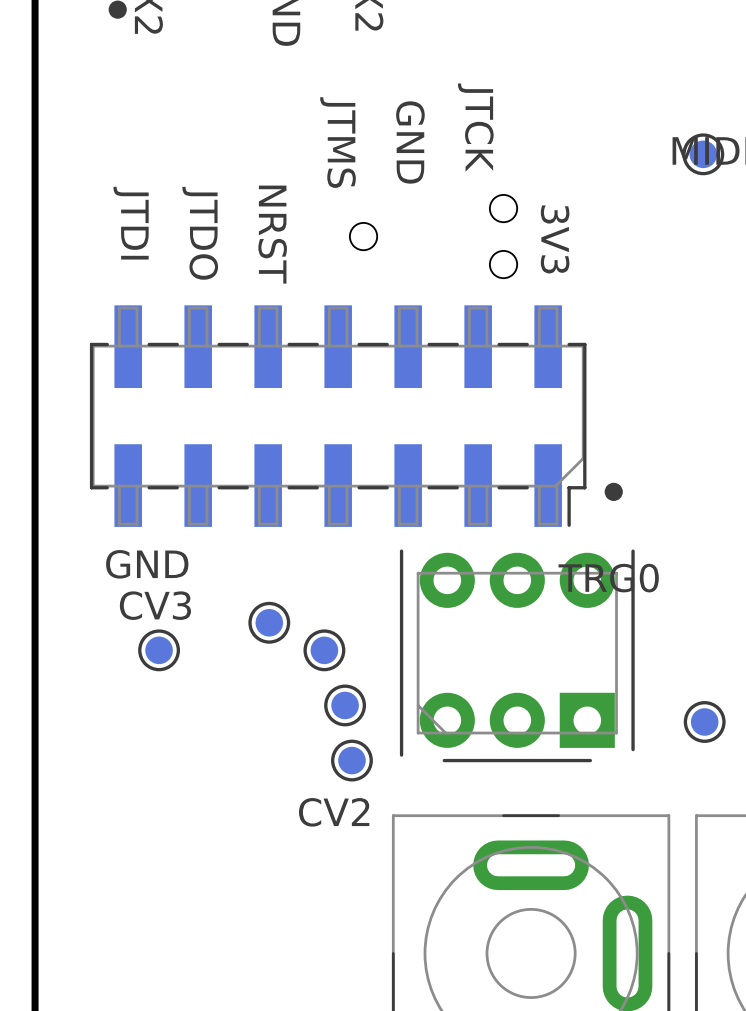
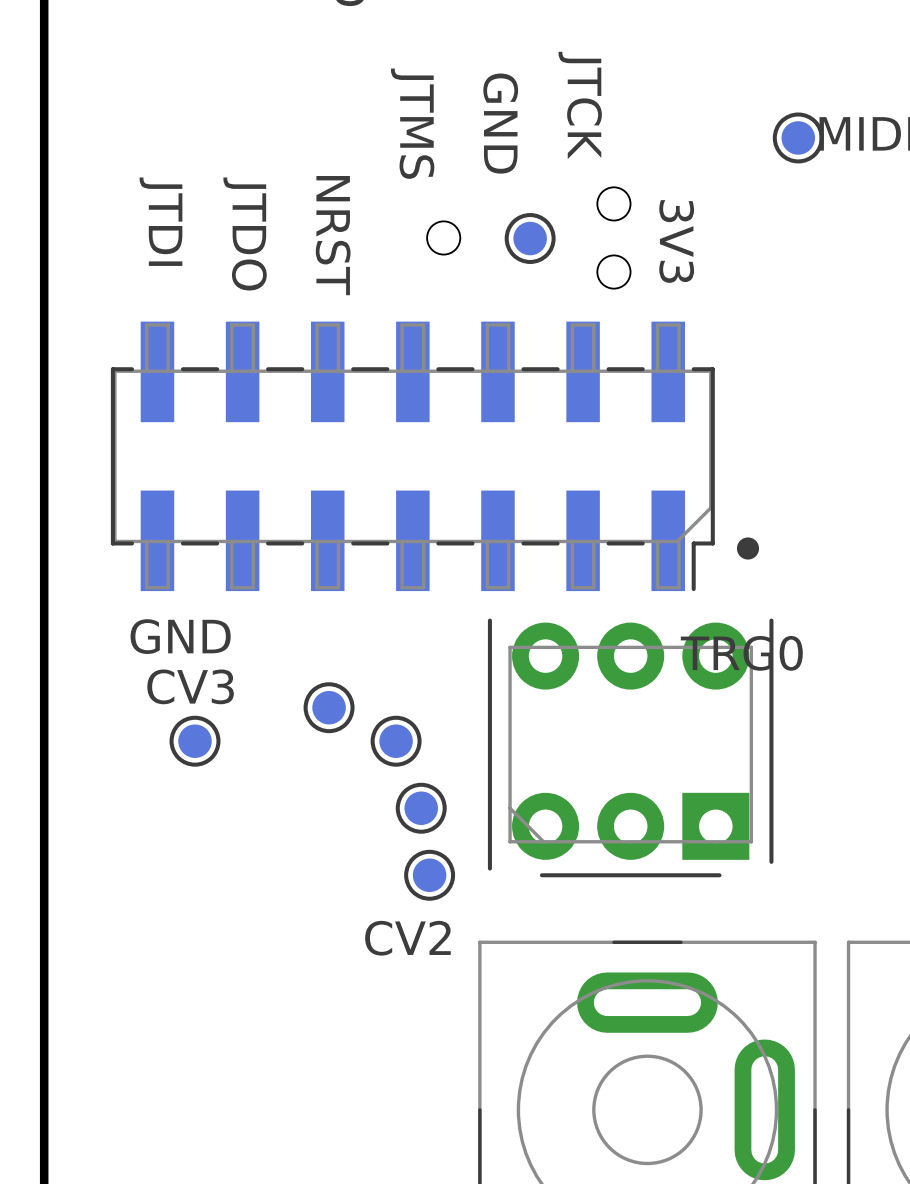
part position: (703, 154) -> (798, 137)
part: none -> (530, 238)
part: (704, 721) -> none

